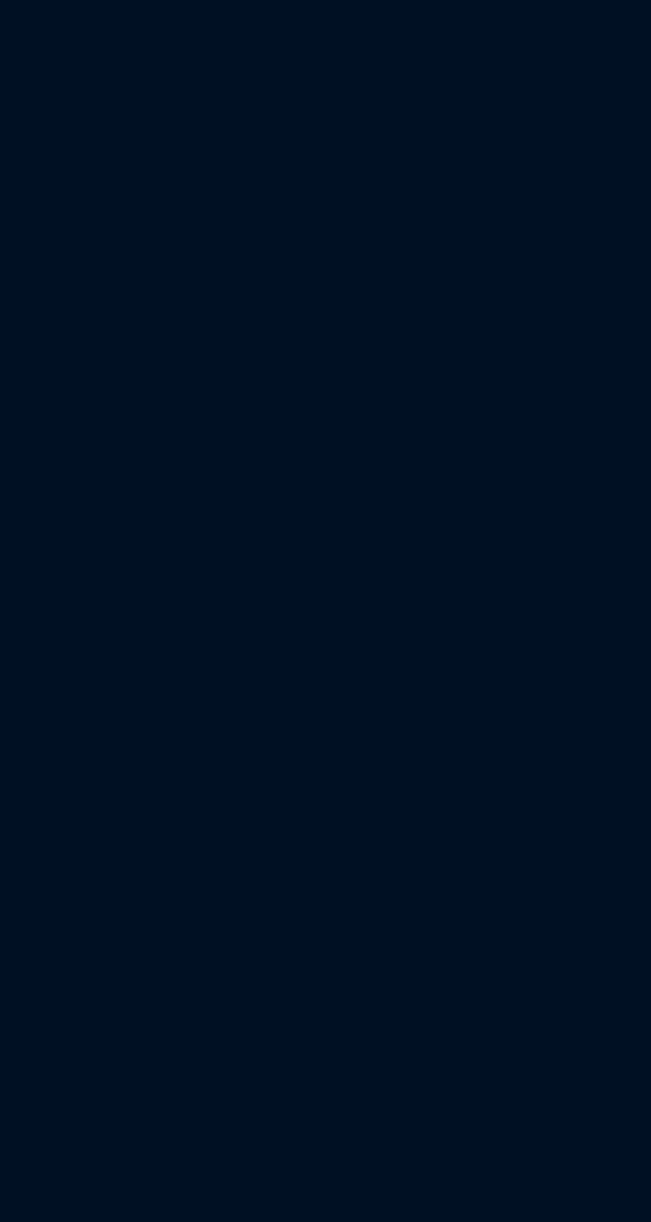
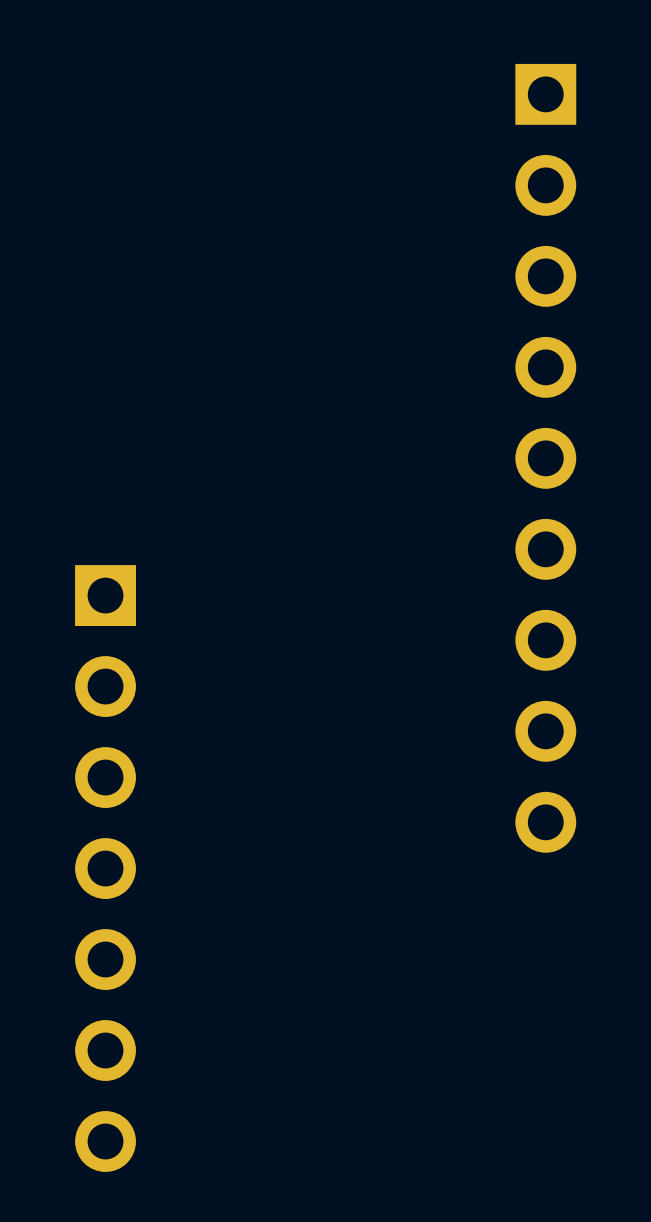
part: none -> (545, 458)
part: none -> (105, 868)

